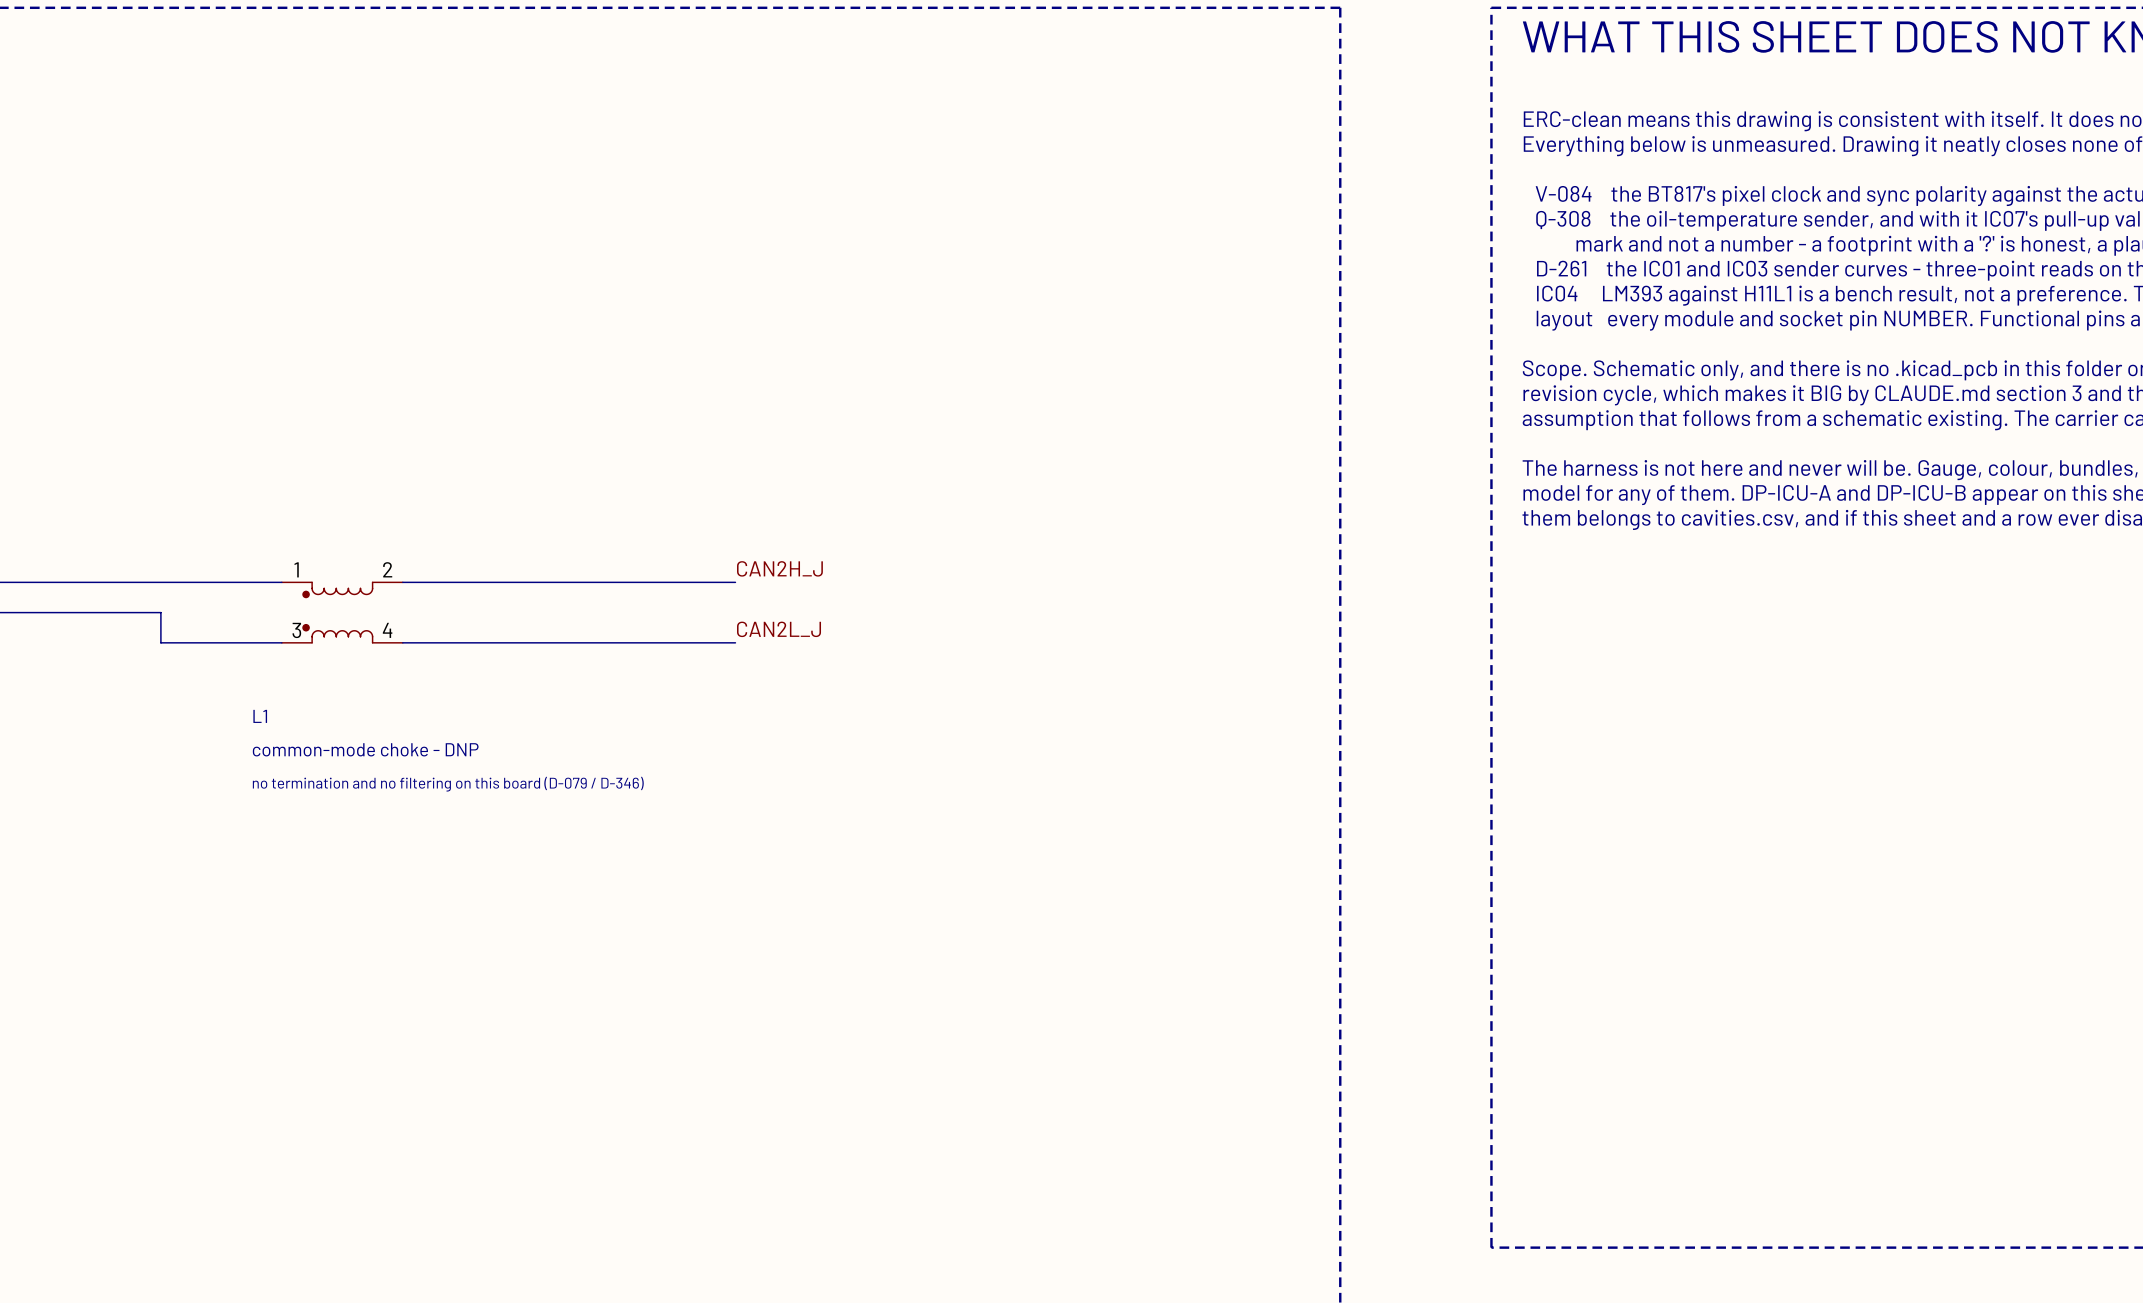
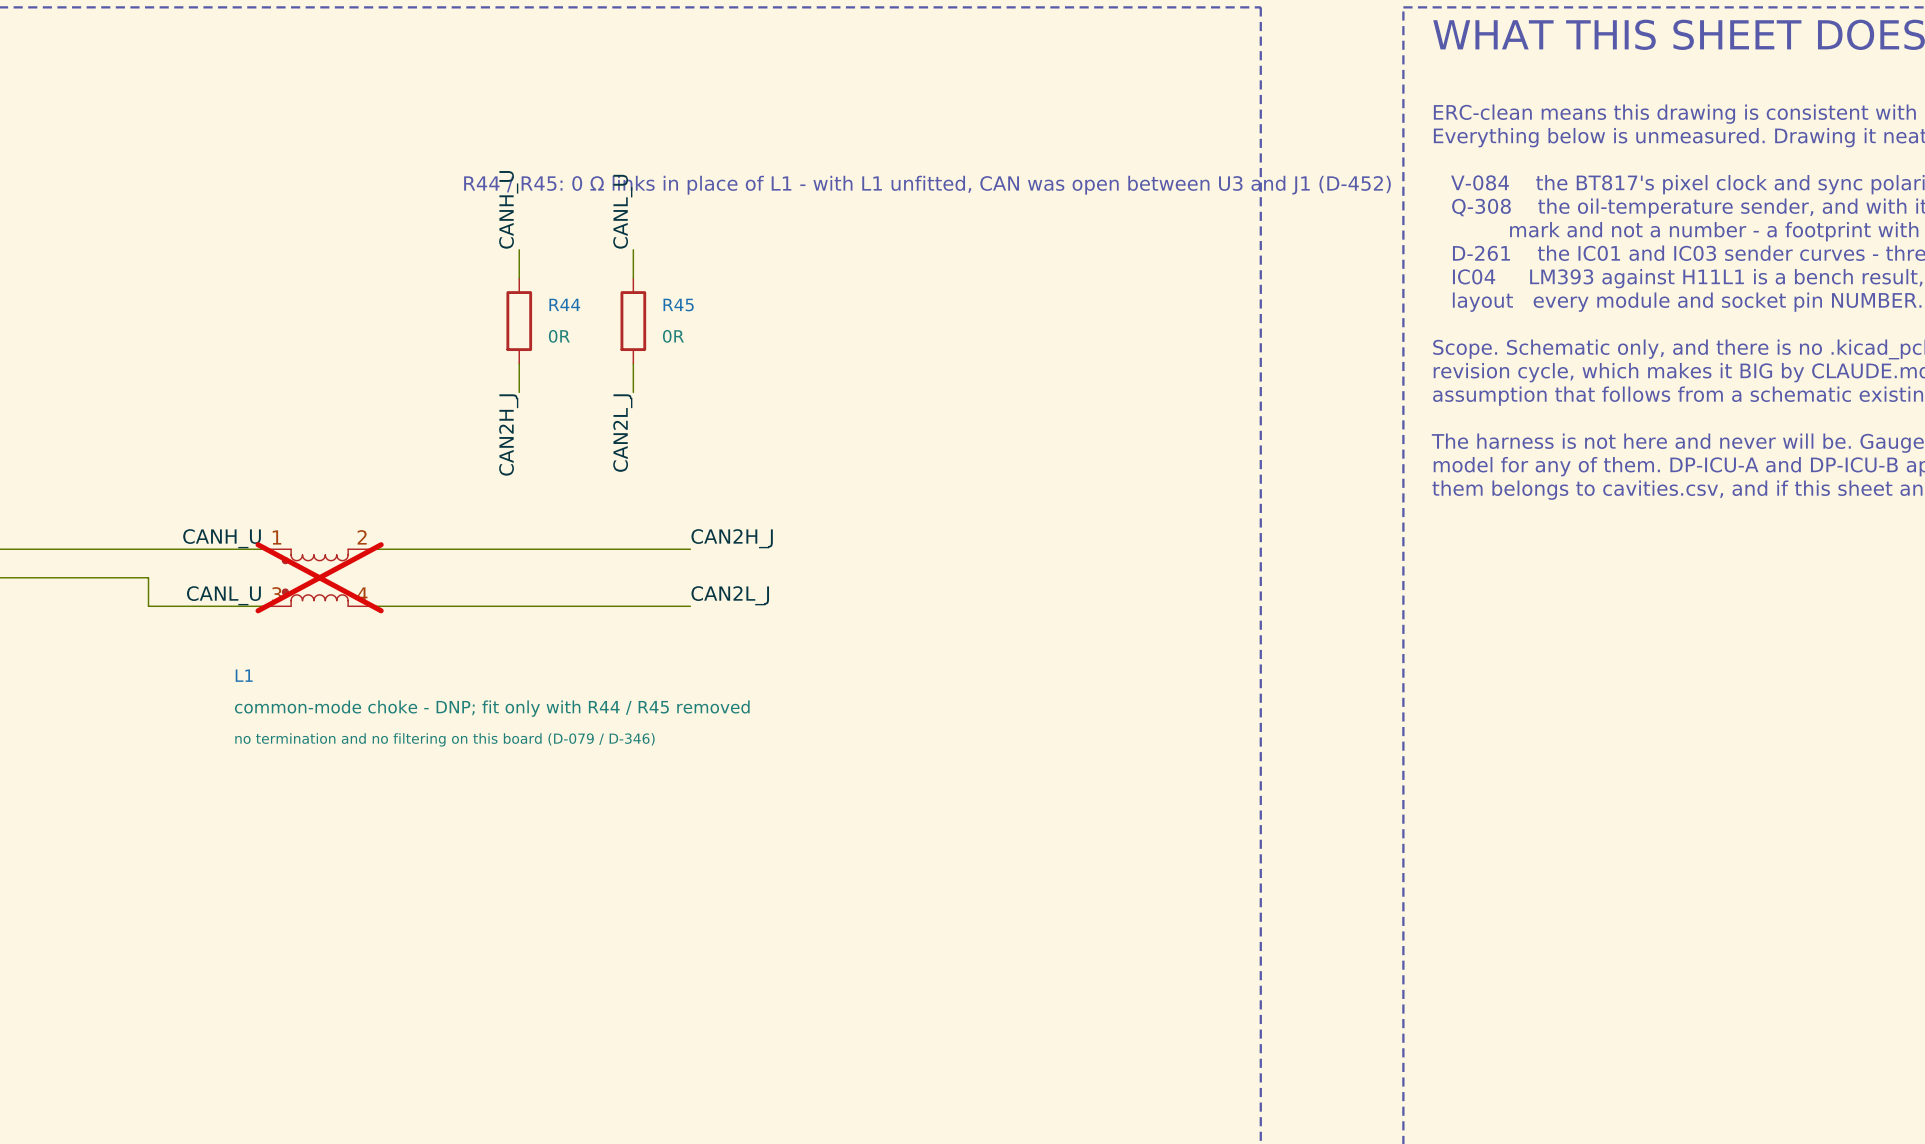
text: none -> R44 / R45: 0 Ω links in place of L1 - with L1 unfitted, CAN was open between U3 and J1 (D-452) (927, 185)
label: none -> CANH_U (508, 209)
label: none -> CANL_U (622, 211)
wire: none -> (519, 249) (519, 278)
wire: none -> (633, 249) (633, 278)
R44: none -> 0R (519, 321)
R45: none -> 0R (633, 321)
wire: none -> (519, 363) (519, 392)
wire: none -> (633, 363) (633, 392)
label: none -> CAN2L_J (622, 433)
label: none -> CAN2H_J (508, 434)
label: none -> CANH_U (222, 538)
L1 do-not-place cross: none -> (319, 577)
label: none -> CANL_U (223, 595)
L1 value: common-mode choke - DNP (365, 749) -> common-mode choke - DNP; fit only with R44 / R45 removed (492, 708)

